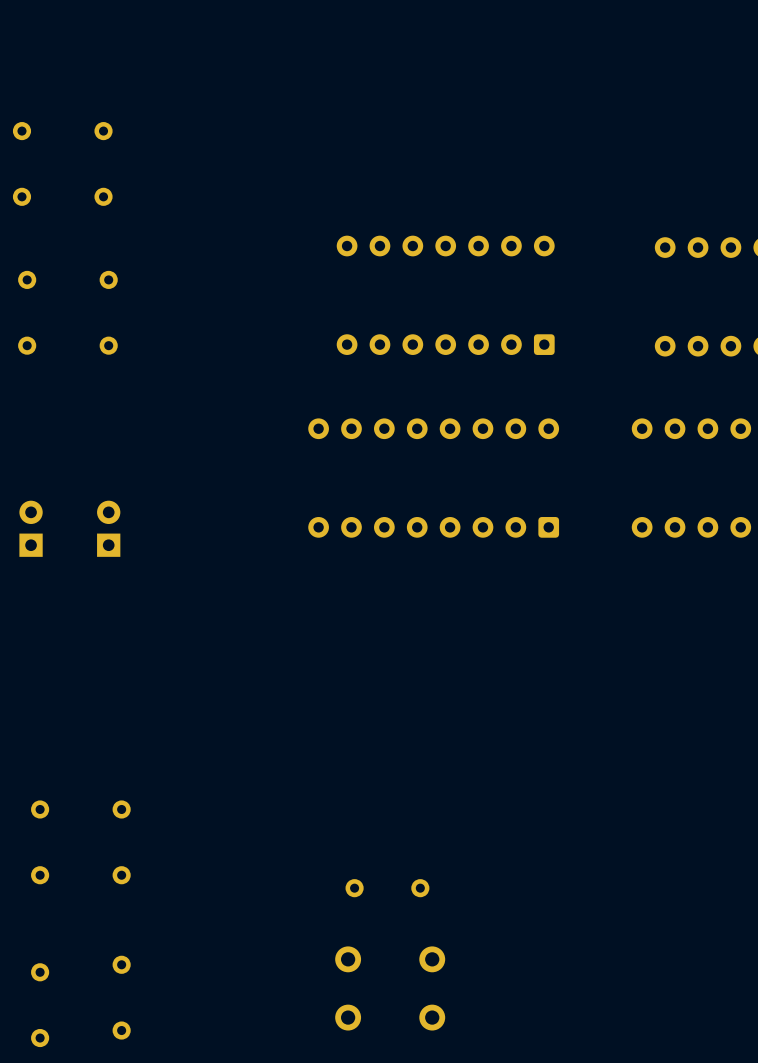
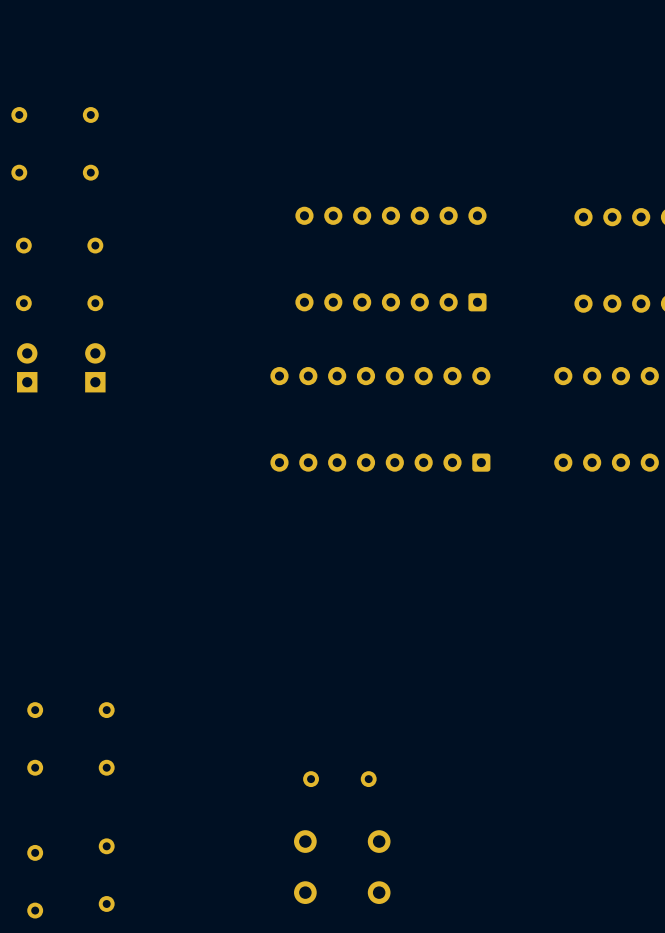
part: none -> (27, 367)
part: none -> (95, 367)
part: (31, 528) -> none
part: (108, 528) -> none

